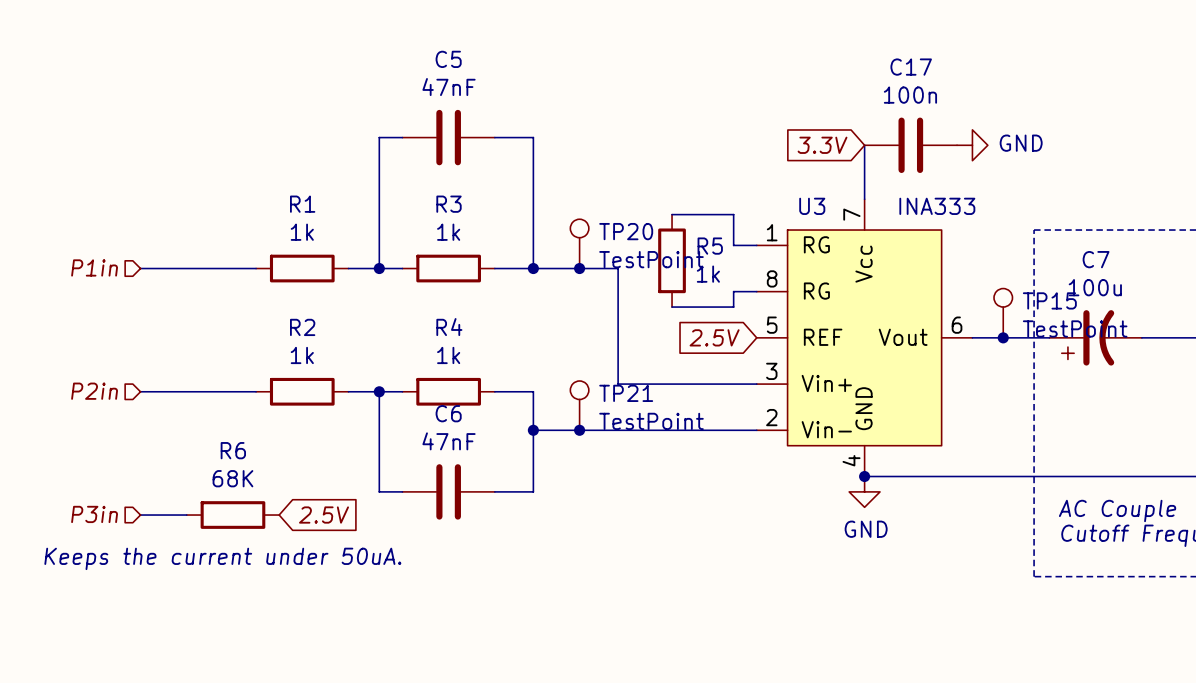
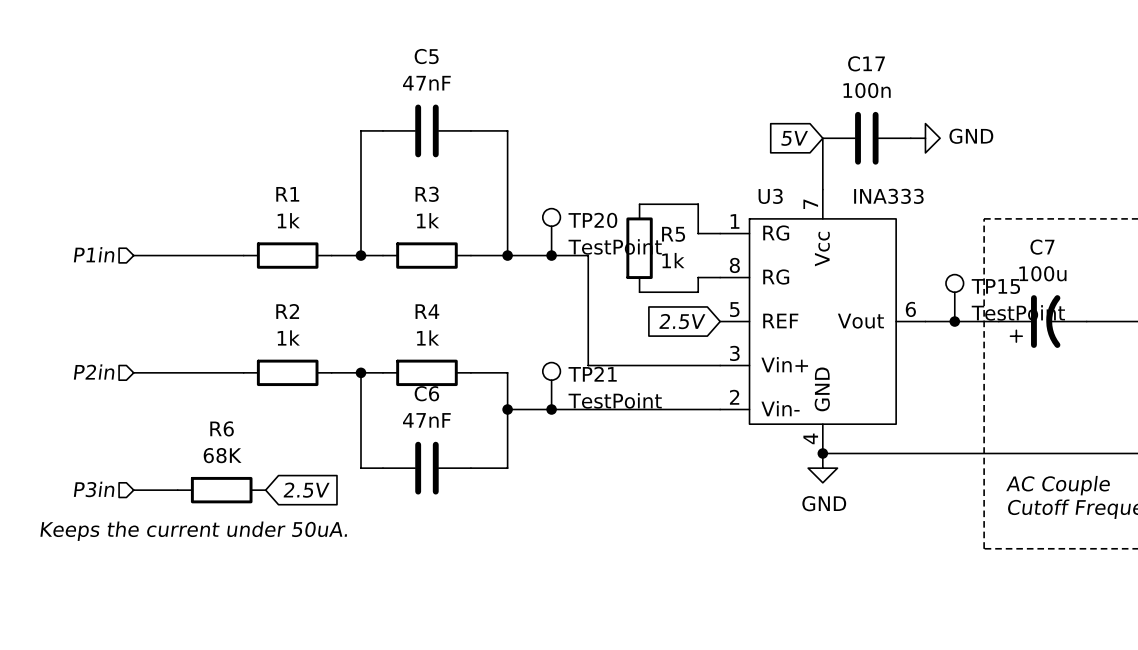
global label: 3.3V (822, 145) -> 5V (794, 138)

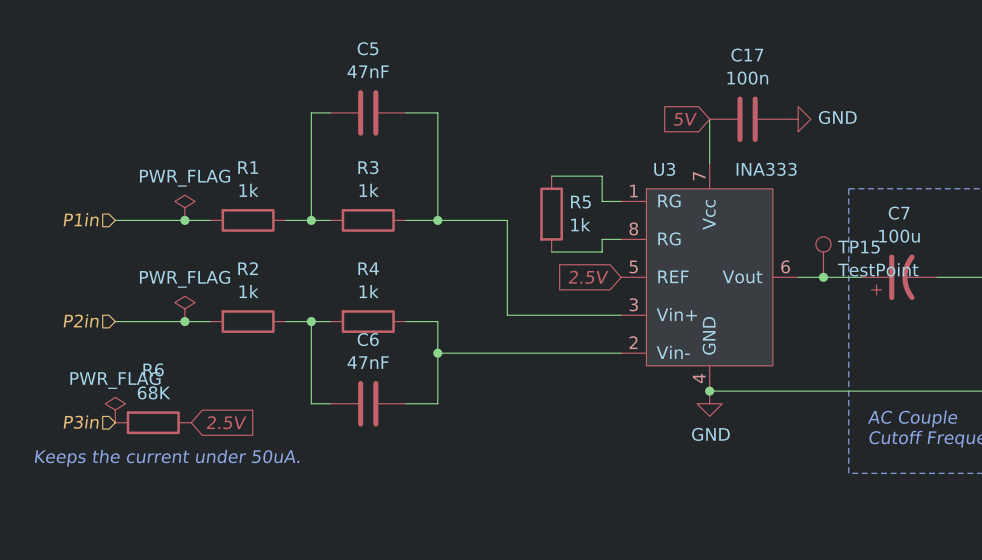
TP20: TestPoint (551, 232) -> none
power symbol: none -> PWR_FLAG (184, 207)
junction: none -> (184, 220)
junction: (551, 255) -> none
power symbol: none -> PWR_FLAG (184, 308)
junction: none -> (184, 321)
TP21: TestPoint (551, 386) -> none
junction: (551, 409) -> none
power symbol: none -> PWR_FLAG (115, 410)
wire: (133, 490) (177, 490) -> none
R6 position: (221, 490) -> (153, 422)
global label position: 2.5V (306, 490) -> 2.5V (226, 422)

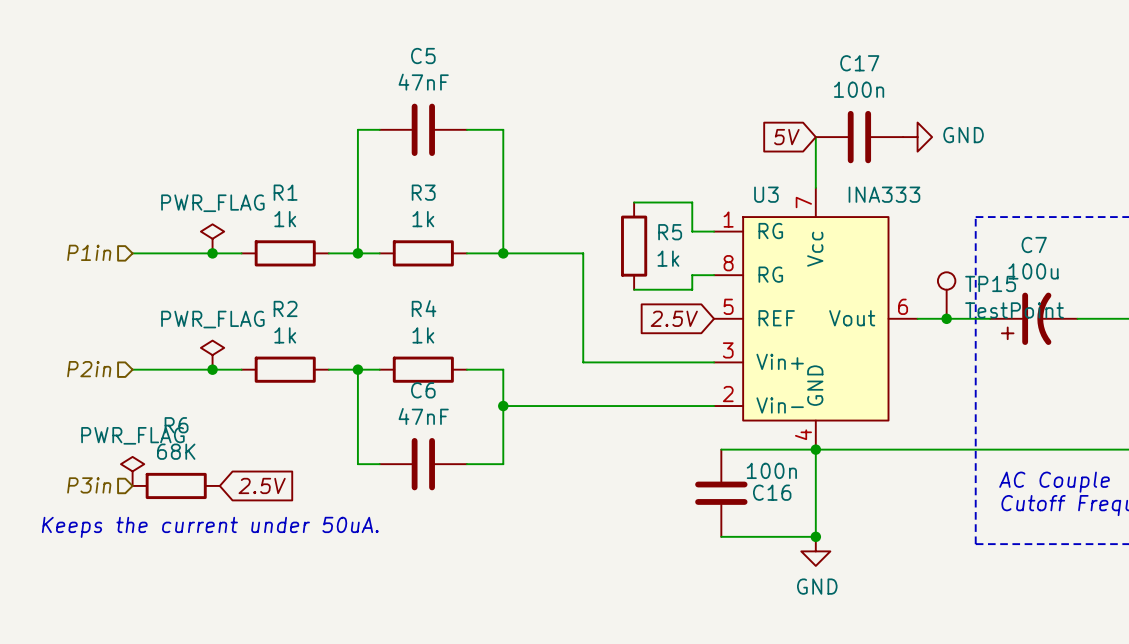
wire: none -> (721, 449) (815, 449) (815, 536) (721, 536)
power symbol position: GND (709, 403) -> GND (815, 551)
C16: none -> 100n (721, 493)
junction: none -> (815, 536)

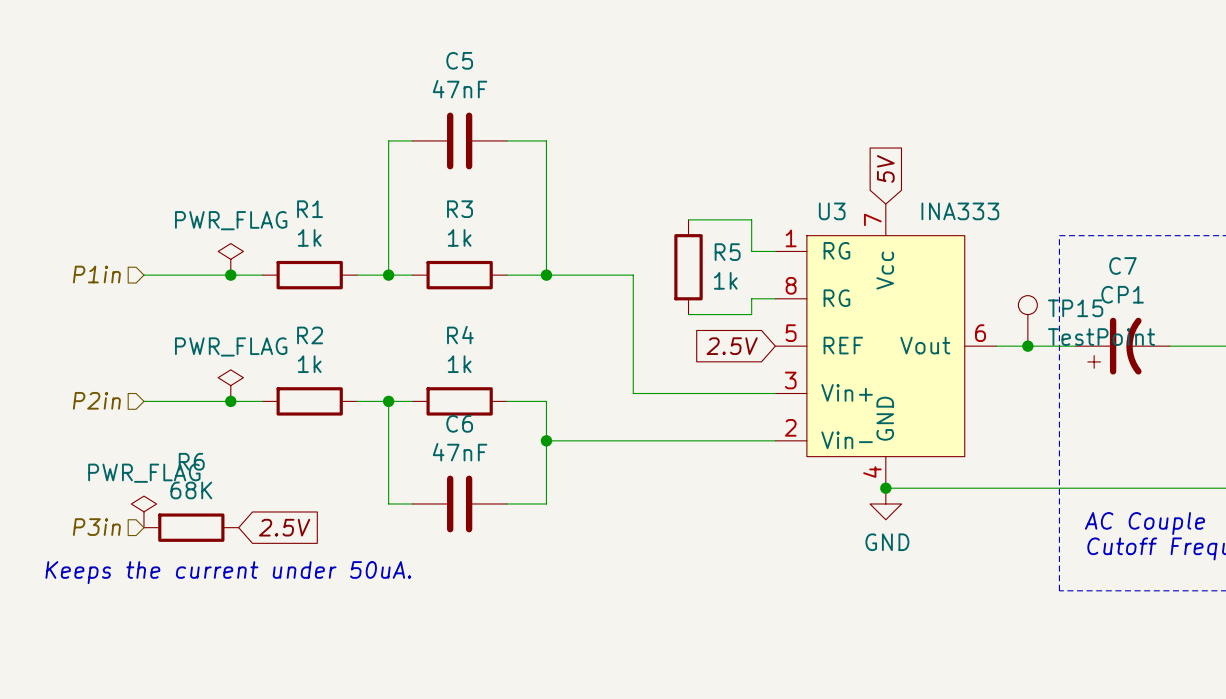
global label rotation: 0° (786, 137) -> 90° clockwise (885, 168)
wire: (815, 137) (815, 187) -> none
C17: 100n (859, 137) -> none
power symbol: GND (917, 137) -> none
C7 value: 100u (1033, 271) -> CP1 (1122, 294)
wire: (721, 449) (815, 449) (815, 536) (721, 536) -> none
C16: 100n (721, 493) -> none
junction: (815, 536) -> none
power symbol position: GND (815, 551) -> GND (885, 503)

